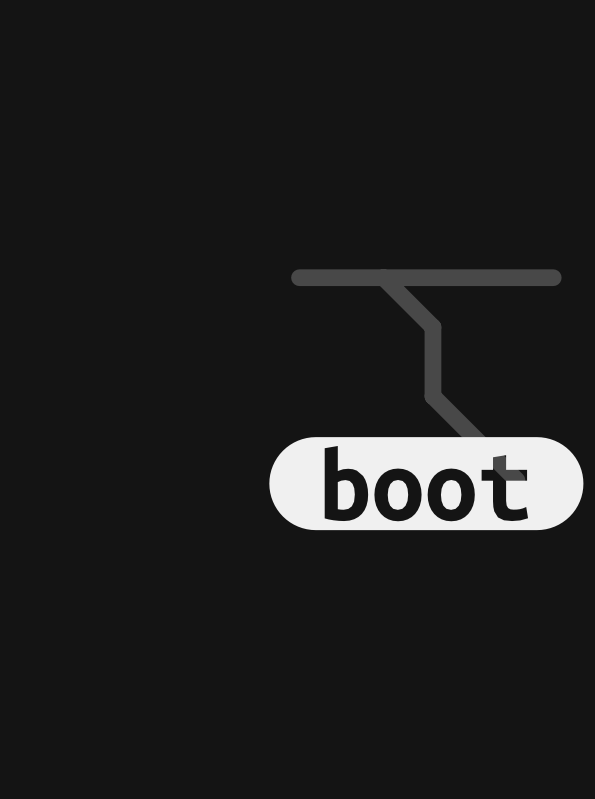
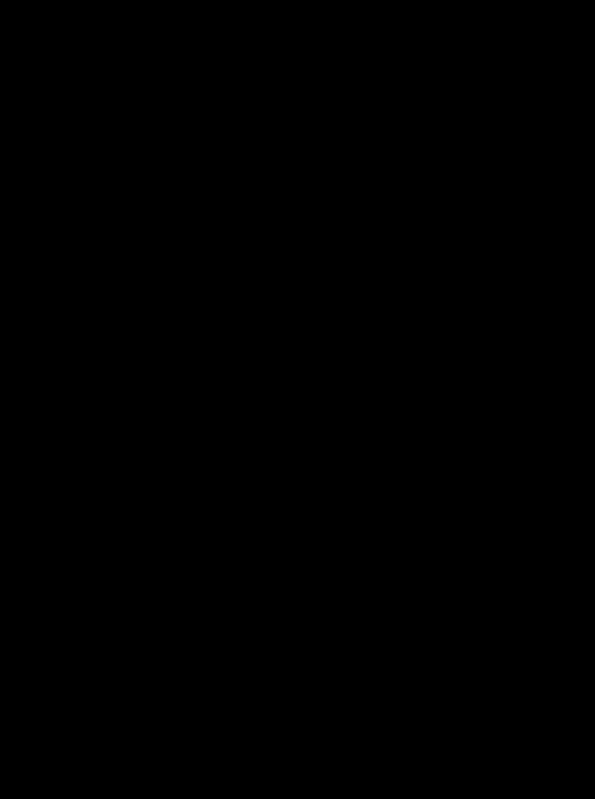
track: (299, 277) (553, 277) -> none
track: (383, 277) (432, 327) (432, 396) (516, 480) -> none
drawing: [269, 437, 584, 531] -> none

